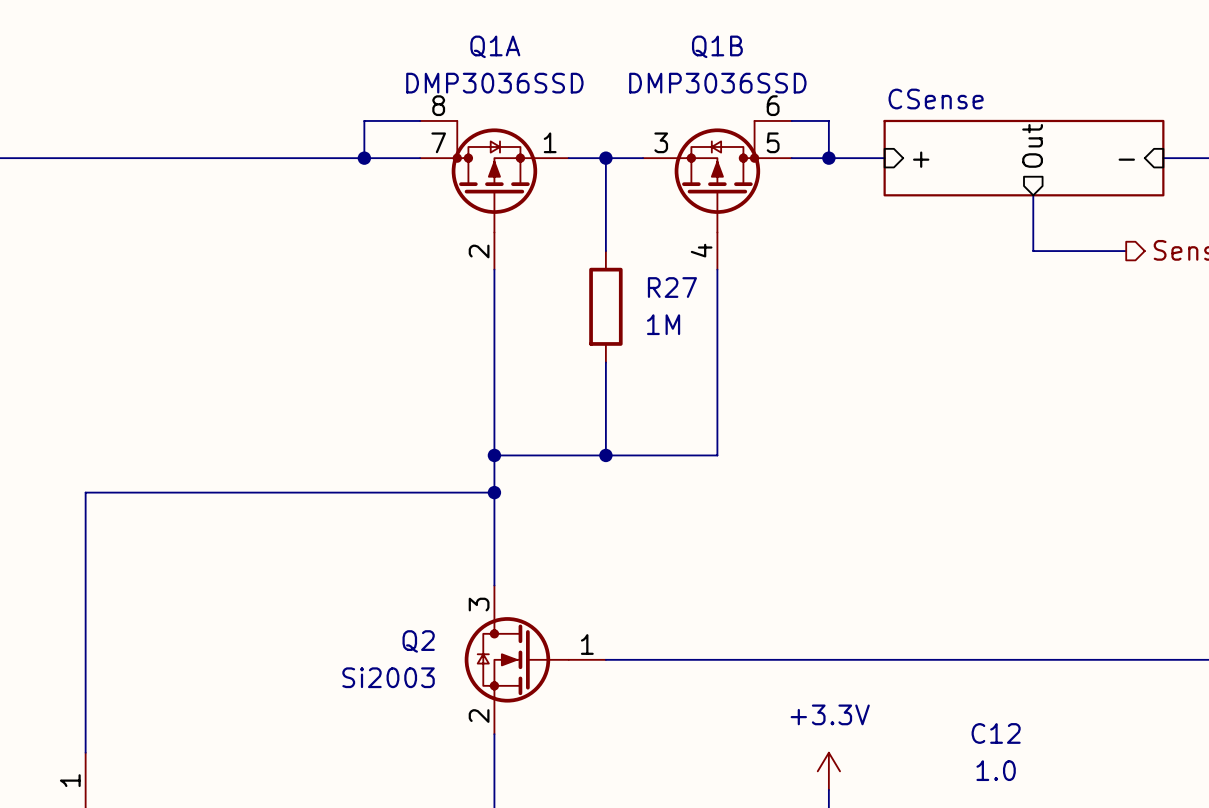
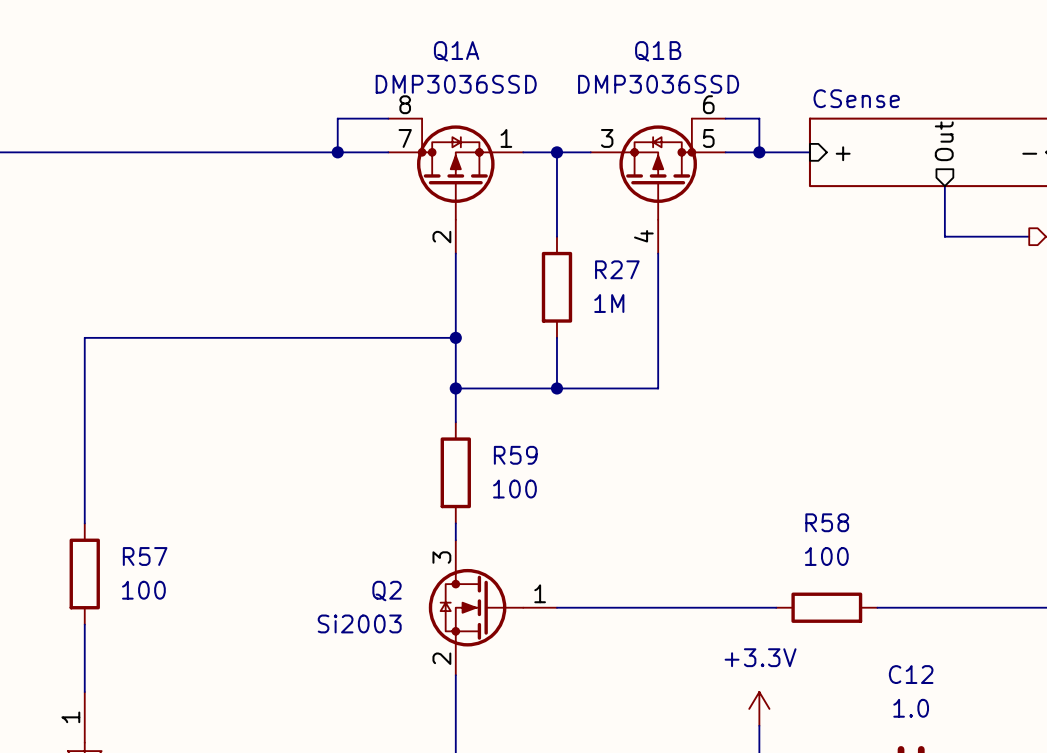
junction: none -> (455, 337)
junction: none -> (455, 388)
wire: (605, 418) (605, 455) -> none
wire: (717, 418) (717, 455) (494, 455) (494, 566) -> (658, 388) (455, 388)
junction: (494, 455) -> none
junction position: (605, 455) -> (556, 388)
wire: (85, 492) (494, 492) -> (84, 455) (84, 337) (455, 337)
junction: (494, 492) -> none
R59: none -> 100 (455, 472)
wire: (85, 566) (85, 678) -> none
R57: none -> 100 (84, 573)
wire: (847, 659) (958, 659) -> none
R58: none -> 100 (826, 607)

